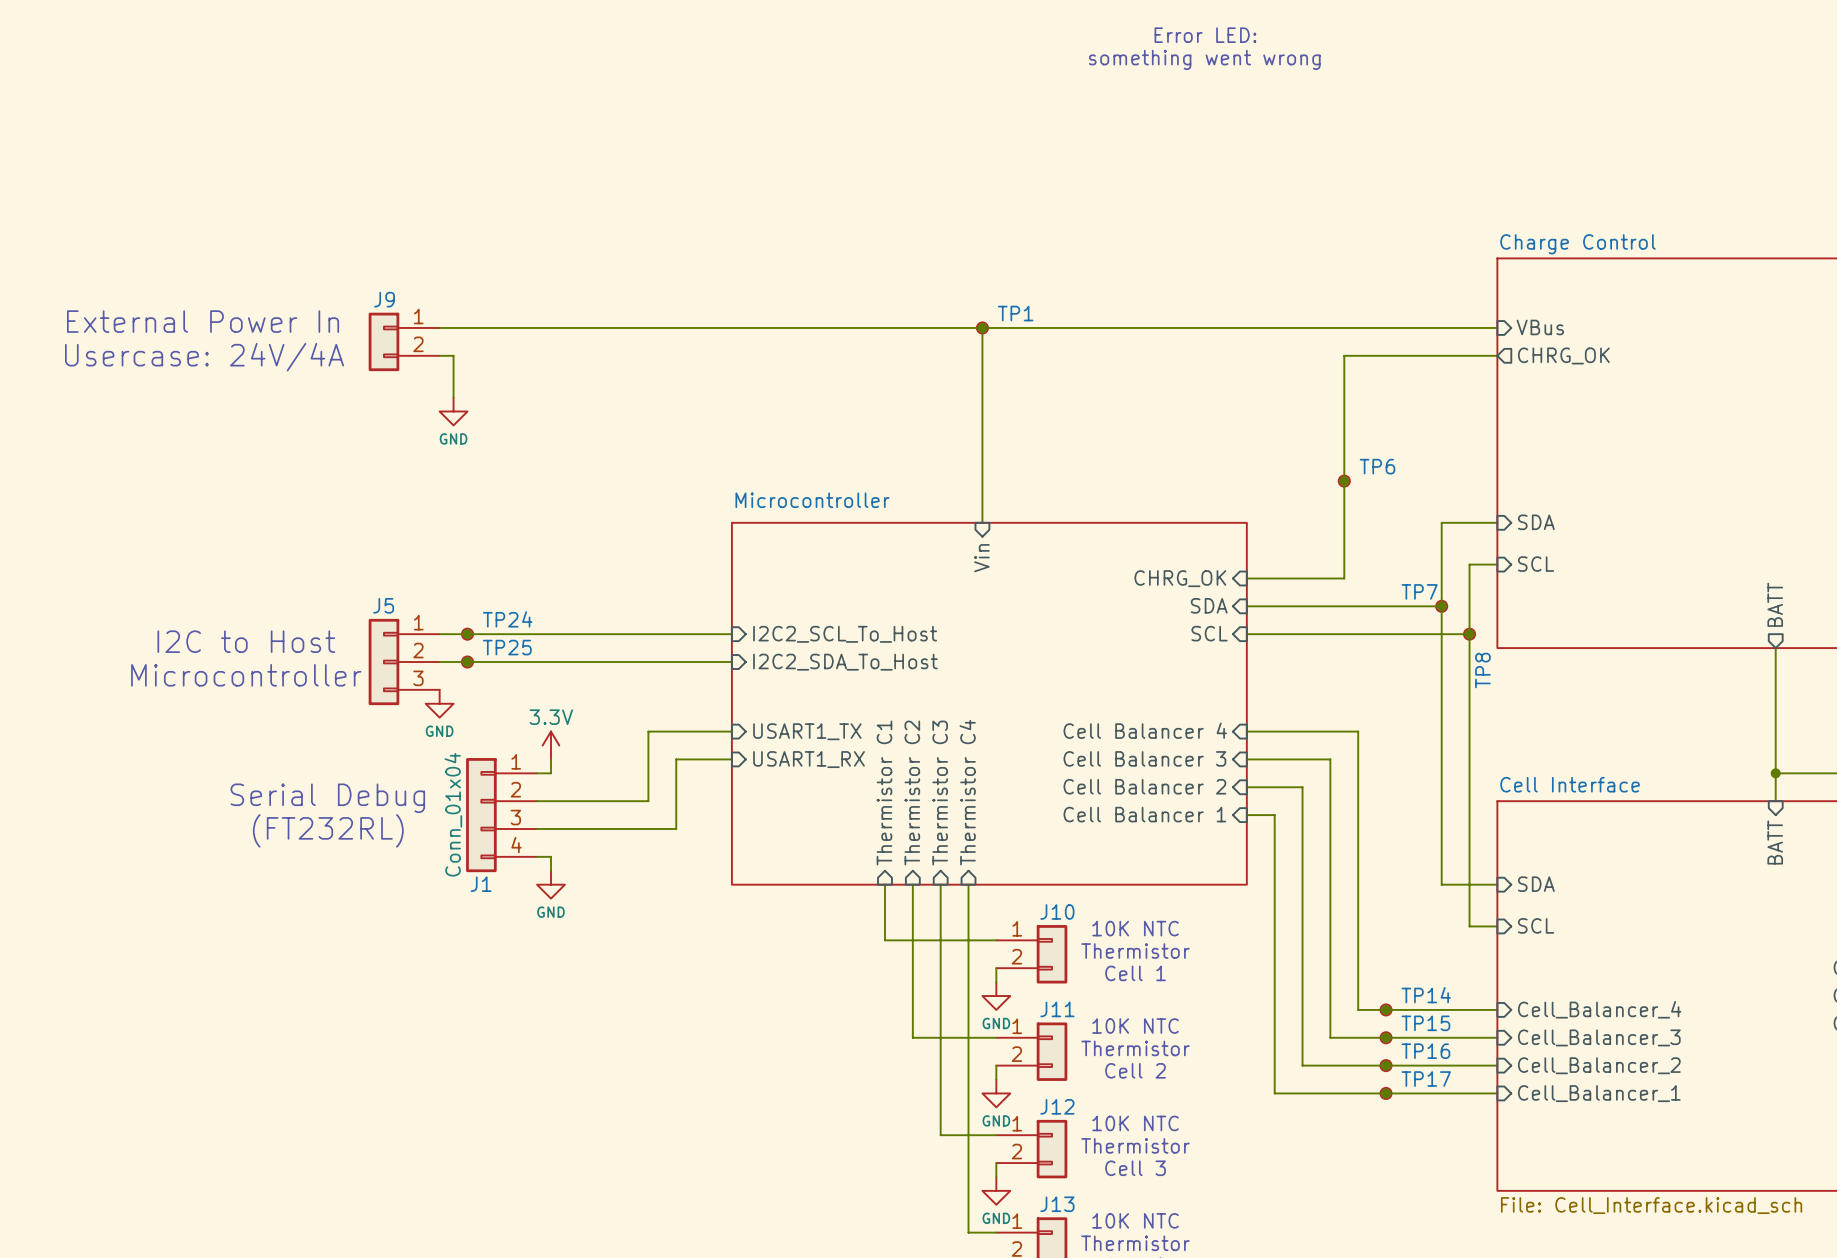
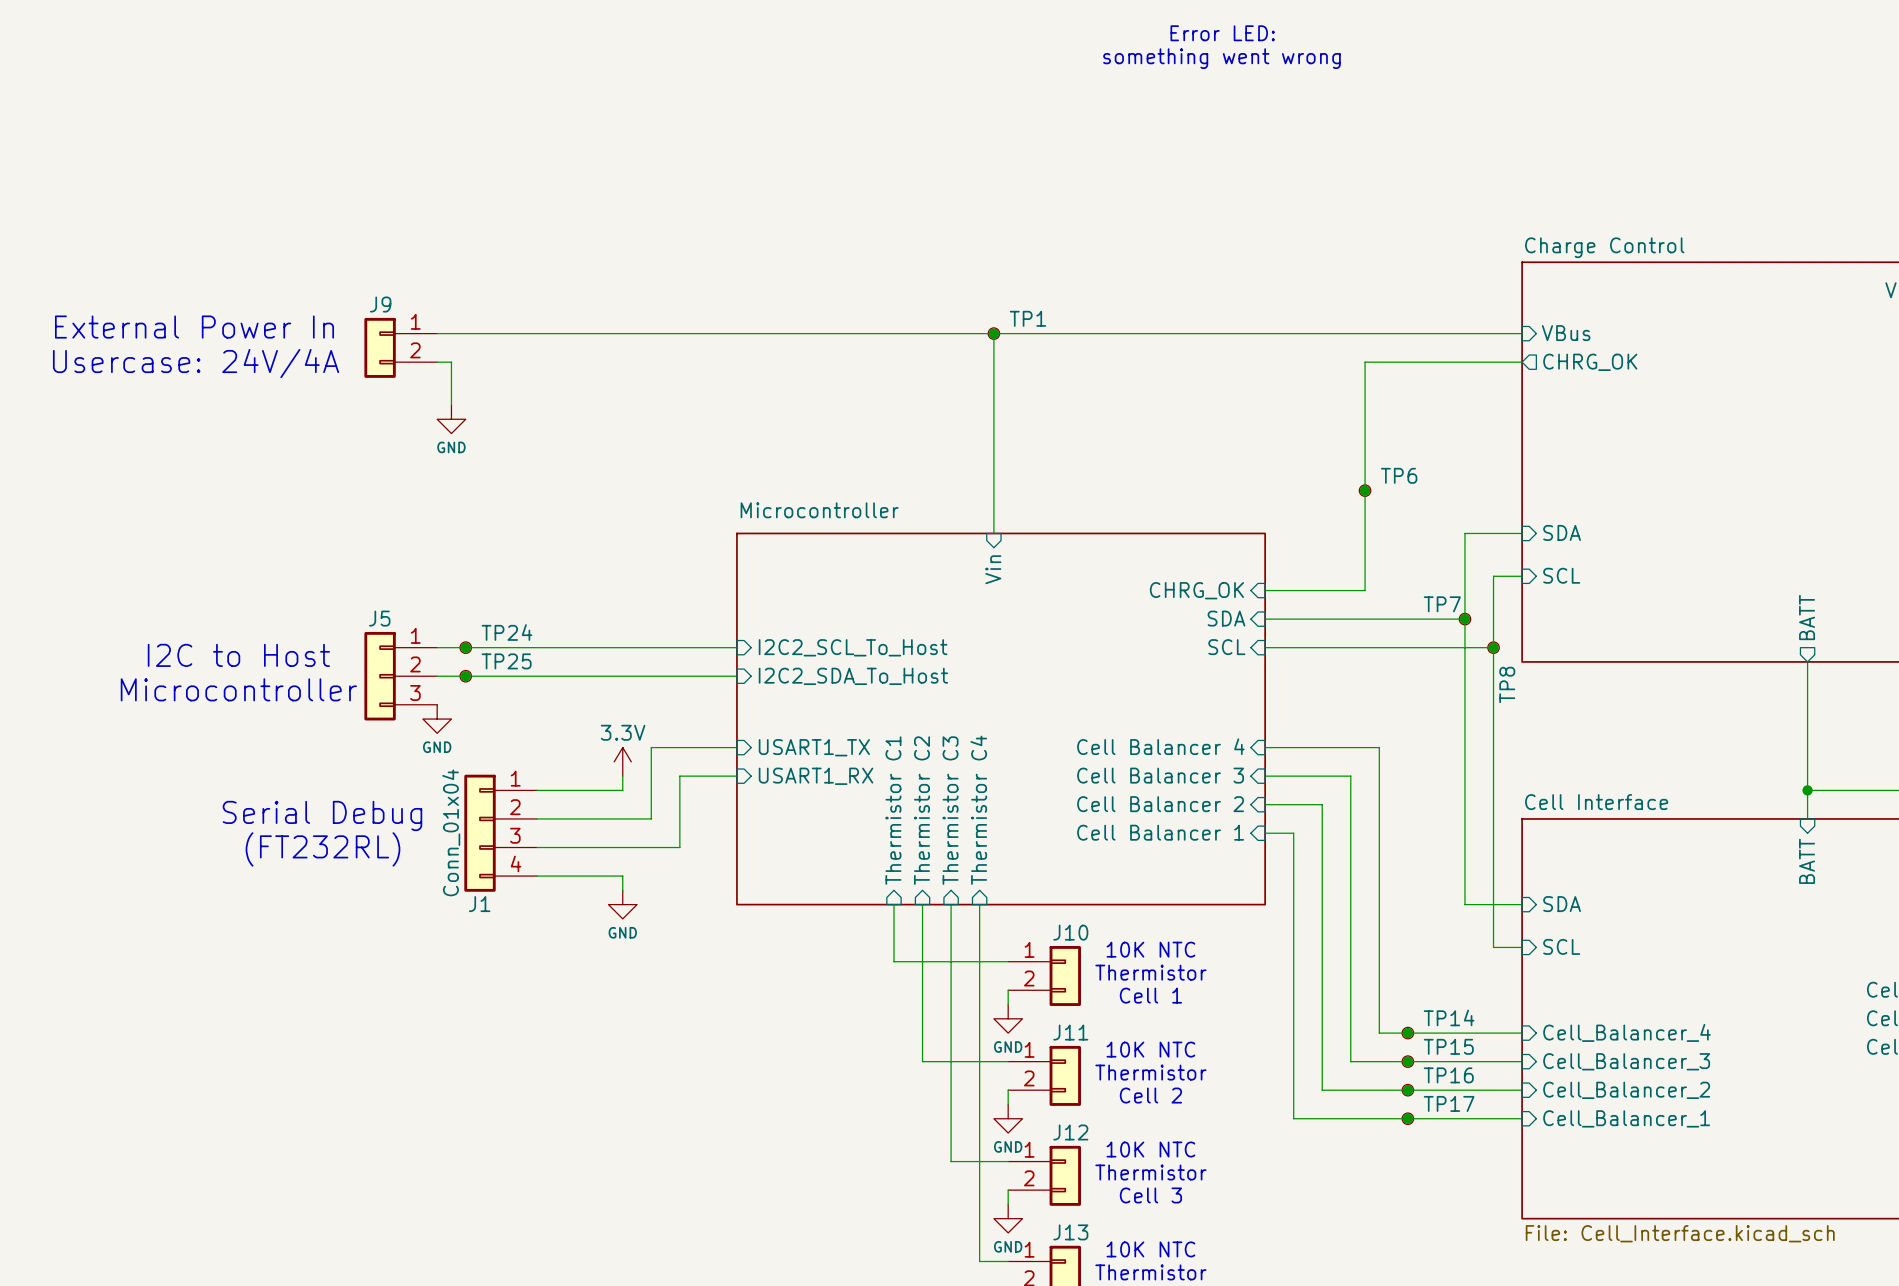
power symbol position: 3.3V (550, 745) -> 3.3V (622, 761)
wire: (550, 759) (550, 773) -> (622, 776) (622, 790) (551, 790)
wire: (550, 856) (550, 870) -> (551, 876) (622, 876) (622, 890)
power symbol position: GND (550, 884) -> GND (622, 904)

